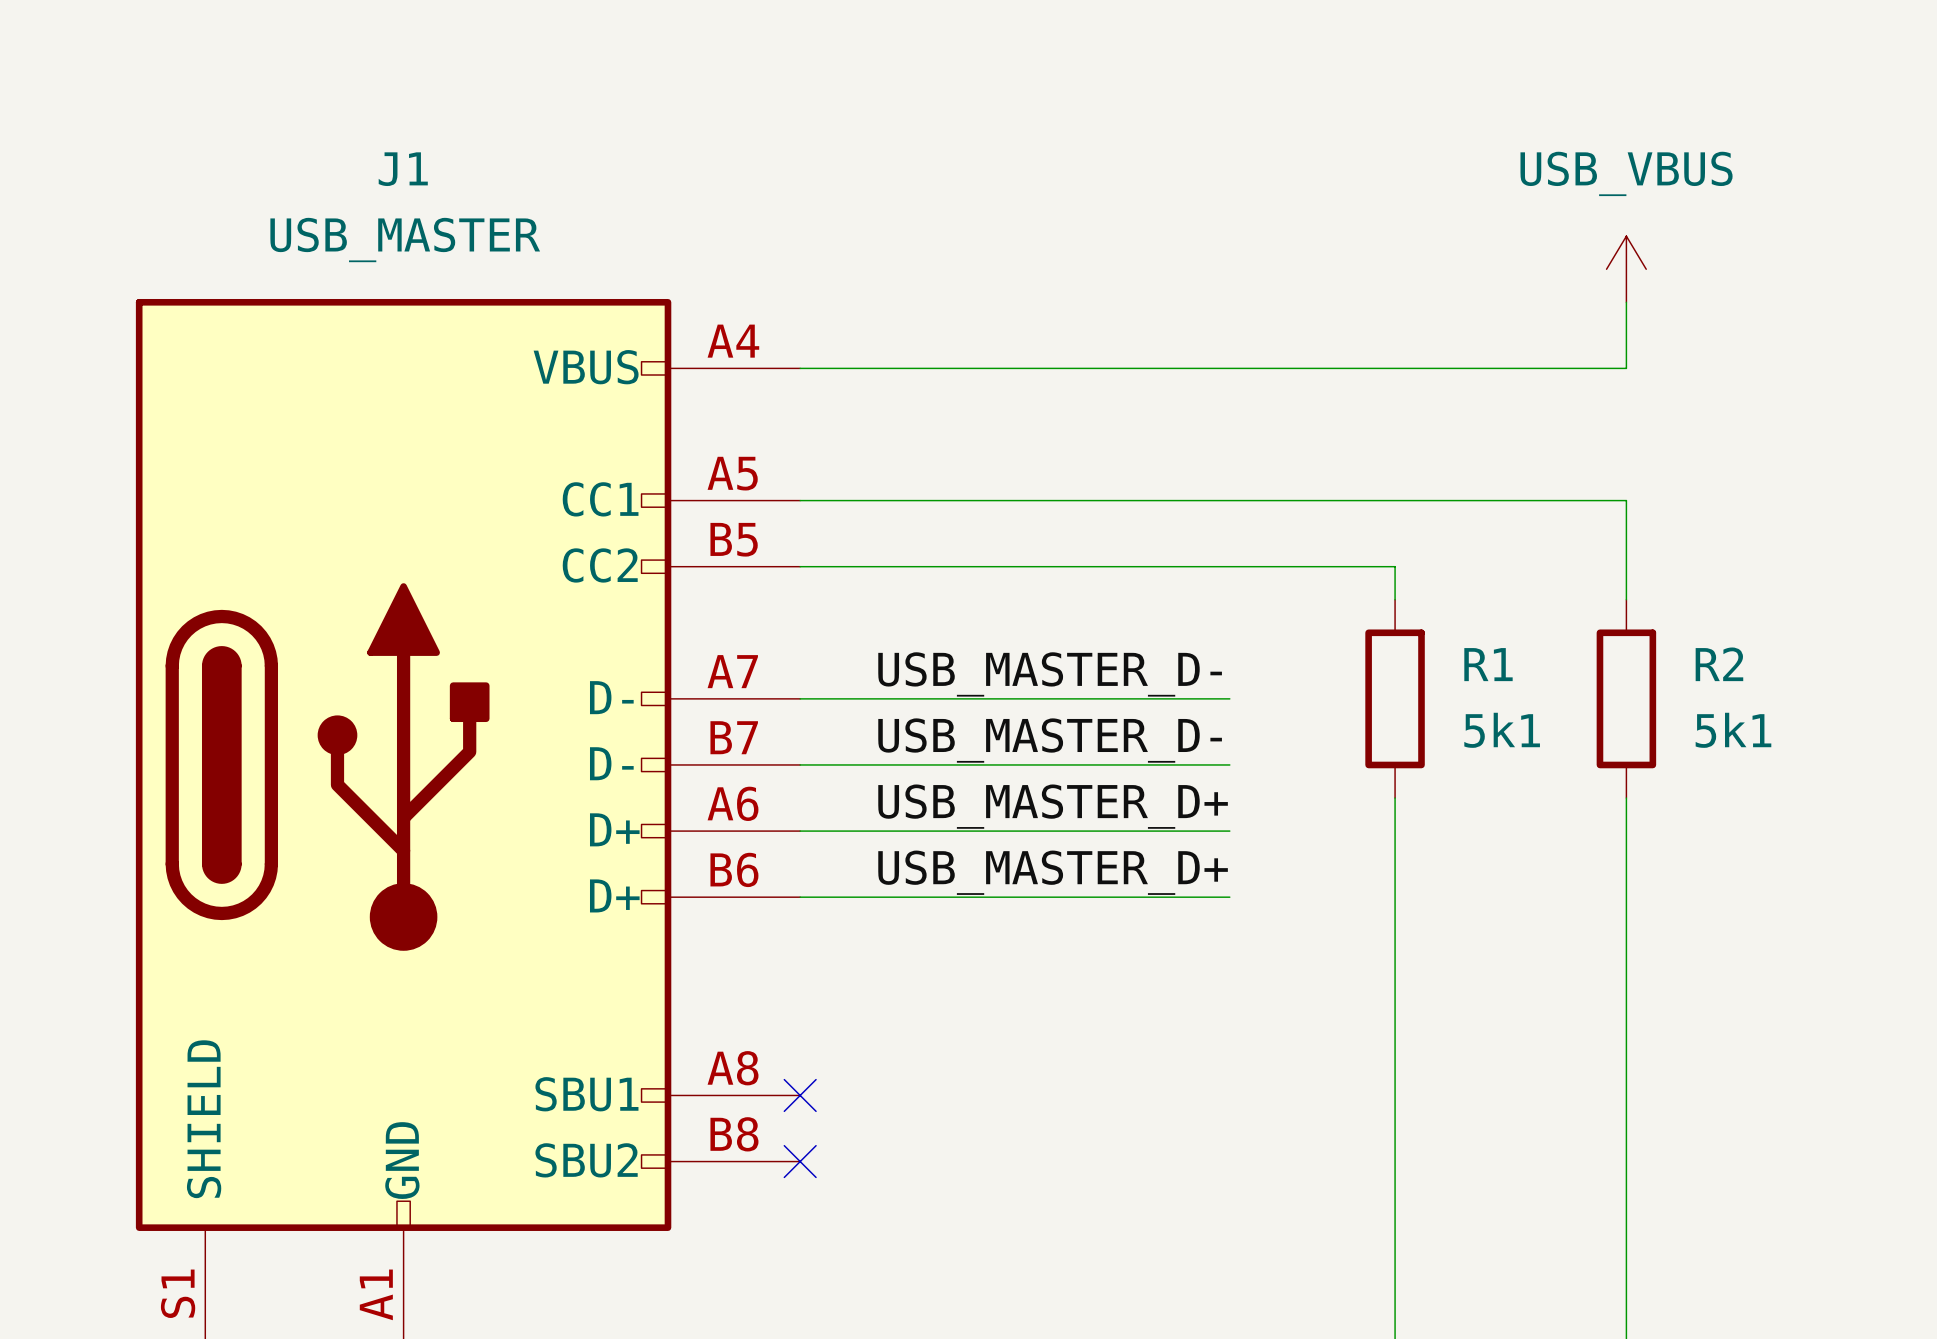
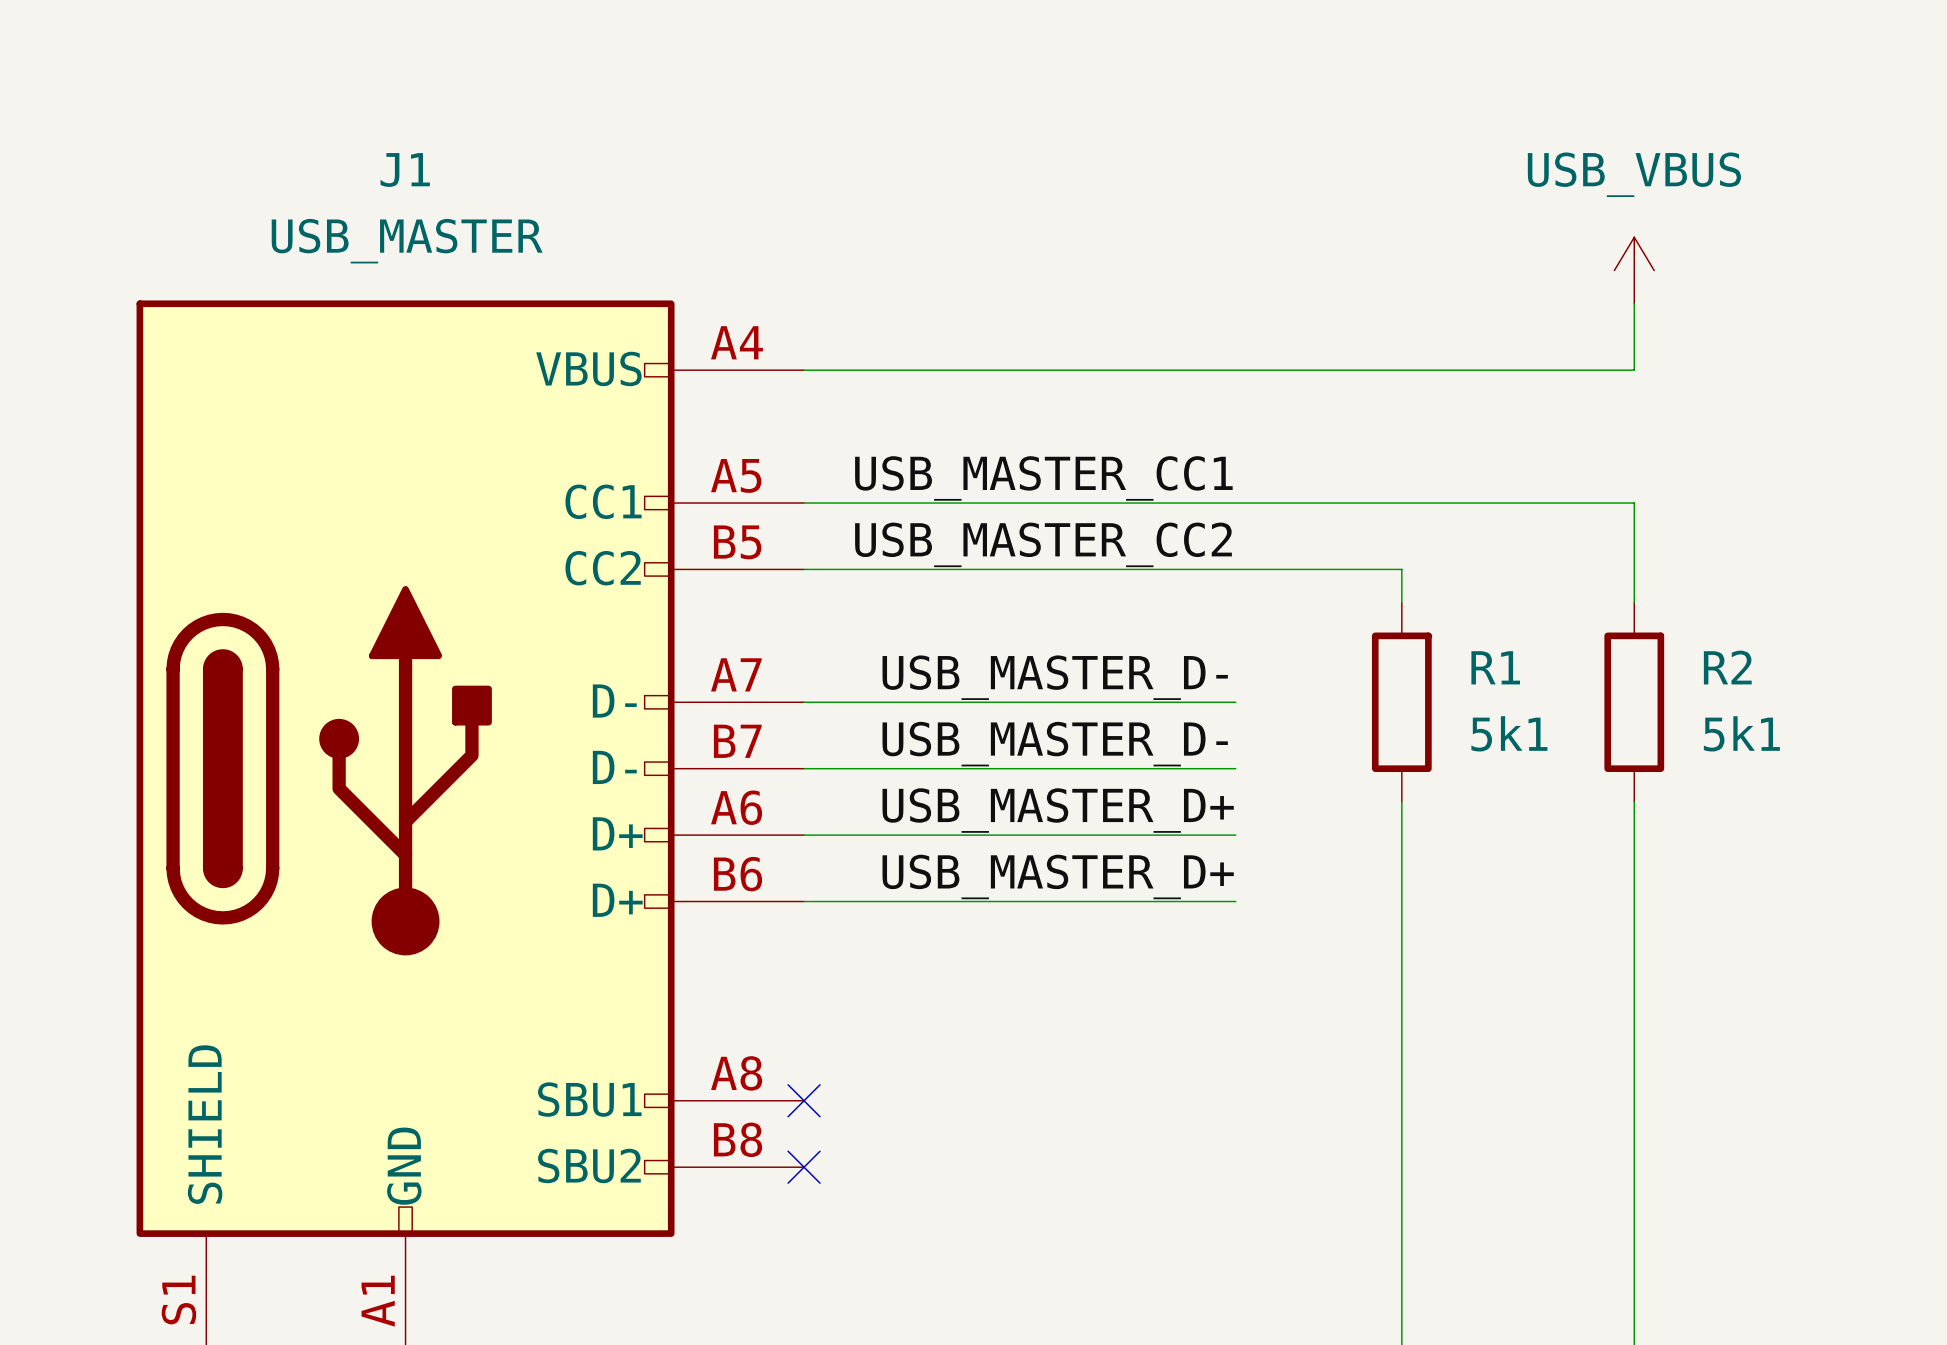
label: none -> USB_MASTER_CC1 (1043, 478)
label: none -> USB_MASTER_CC2 (1043, 544)

